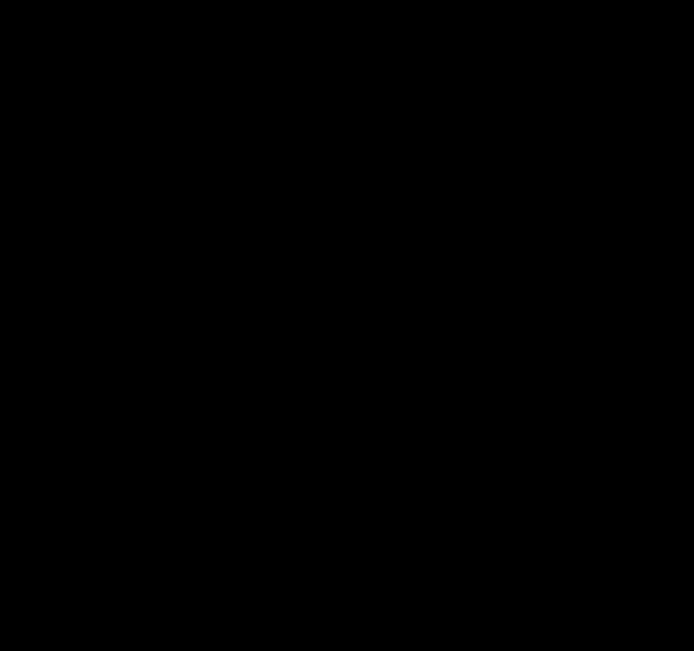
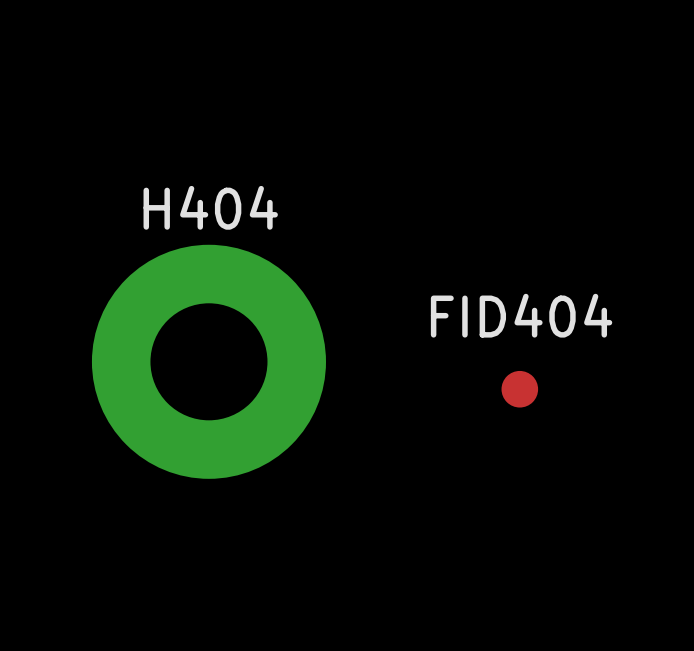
H404: none -> (208, 361)
FID404: none -> (519, 389)

